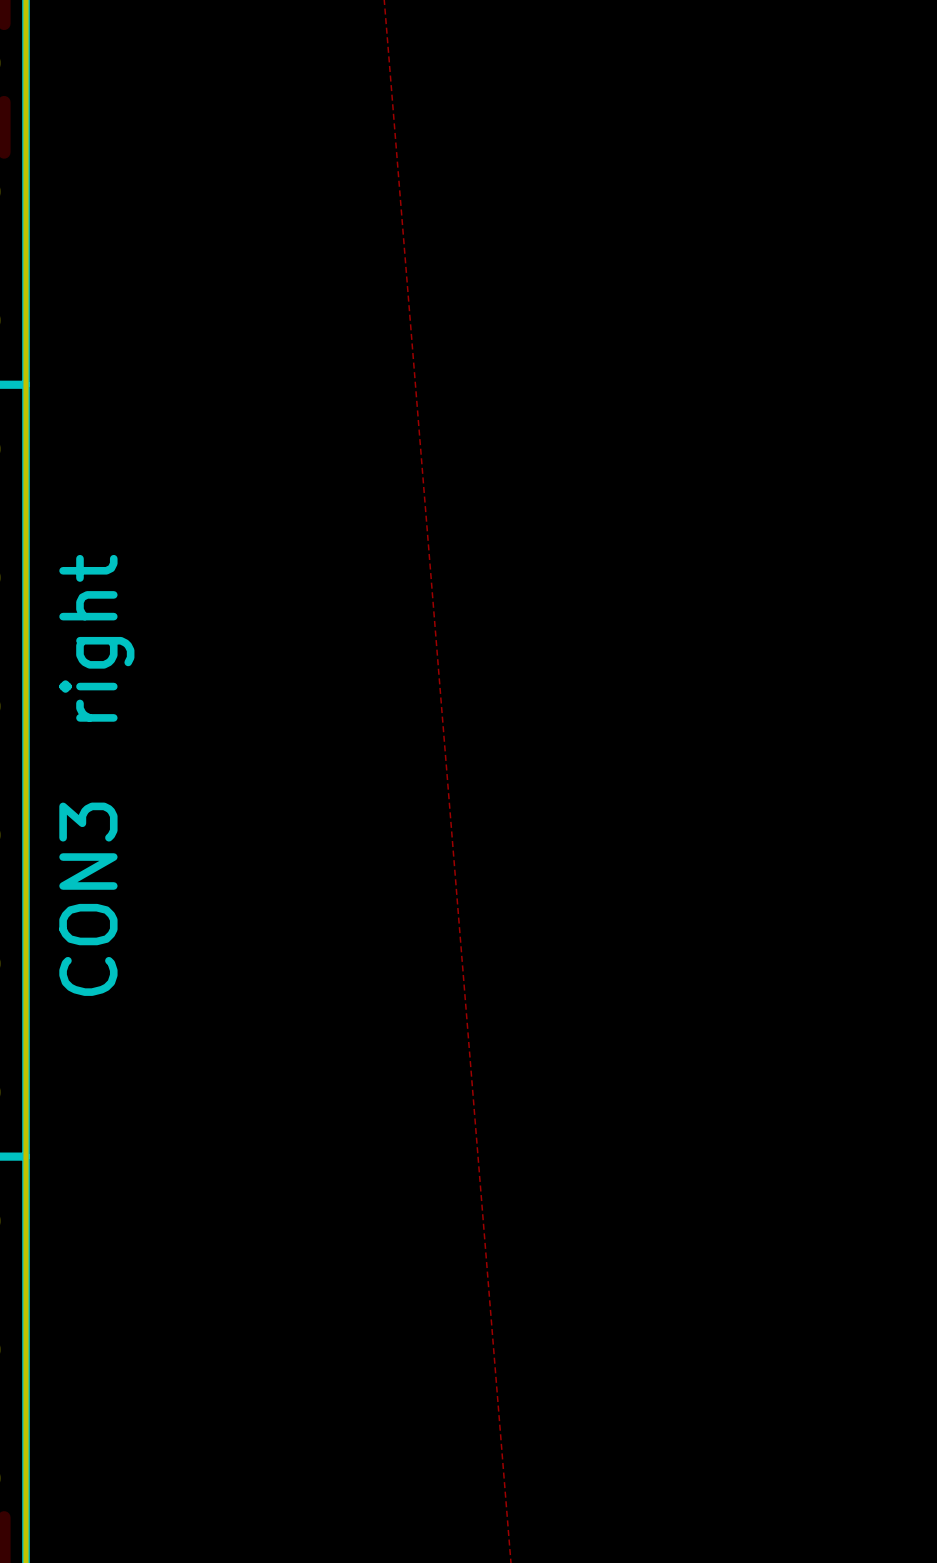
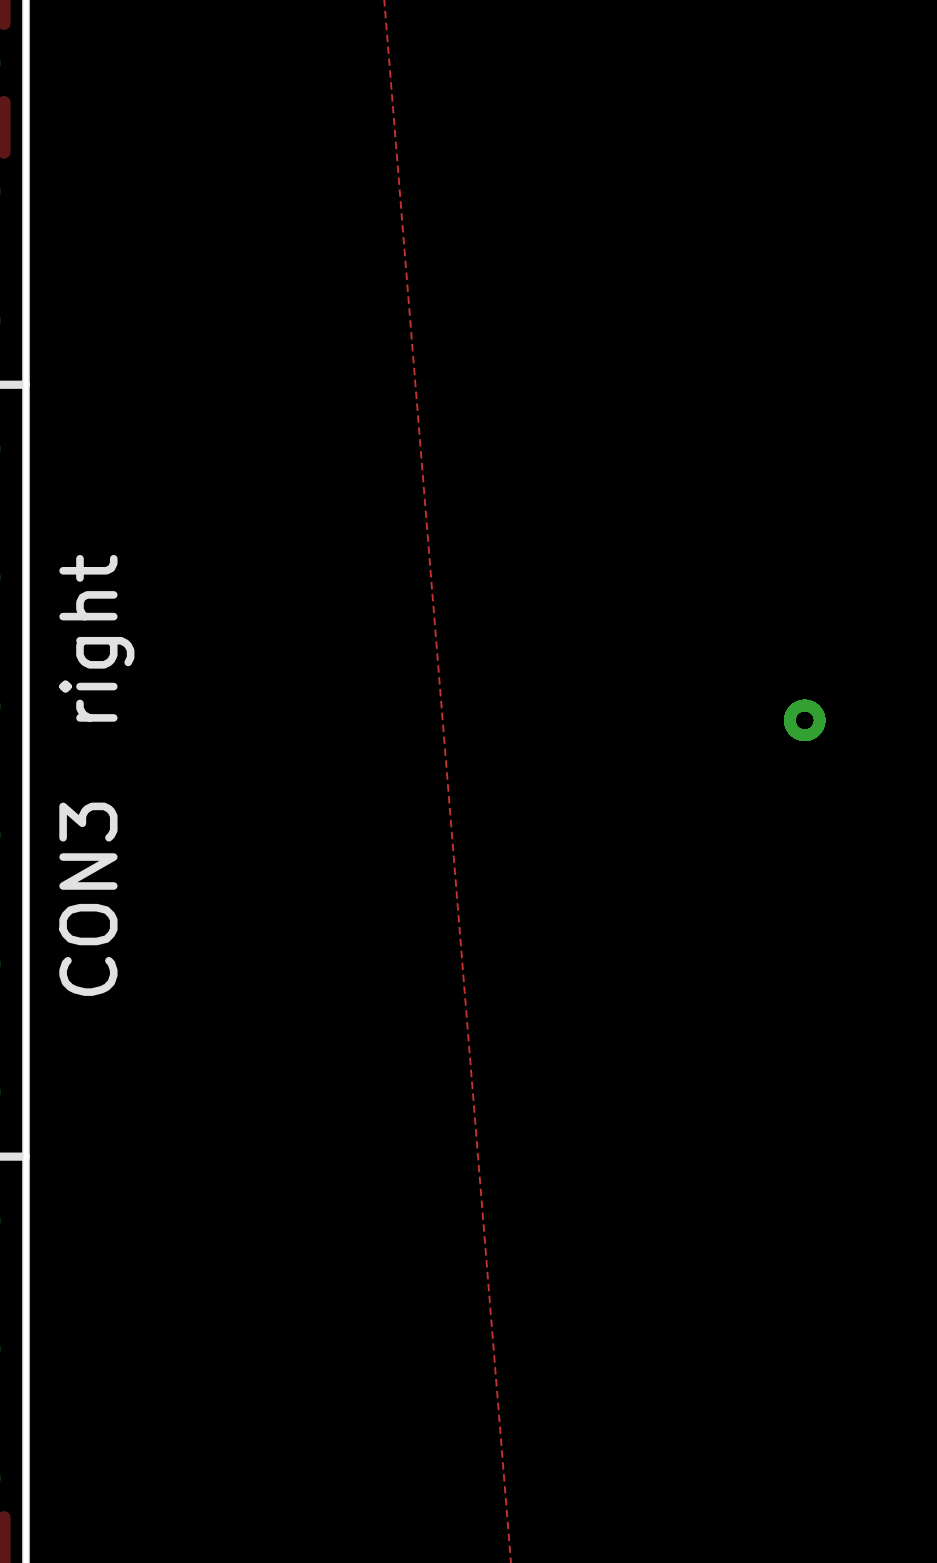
part: none -> (804, 720)

